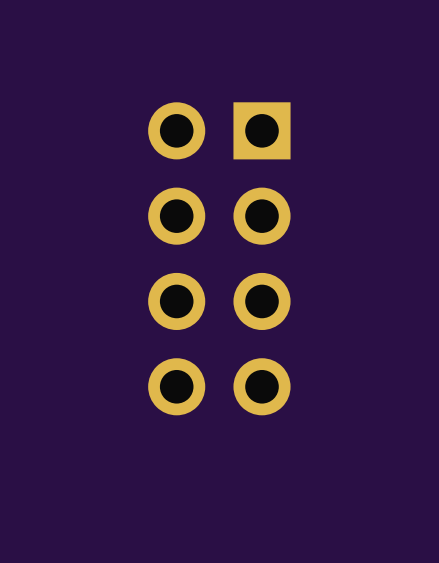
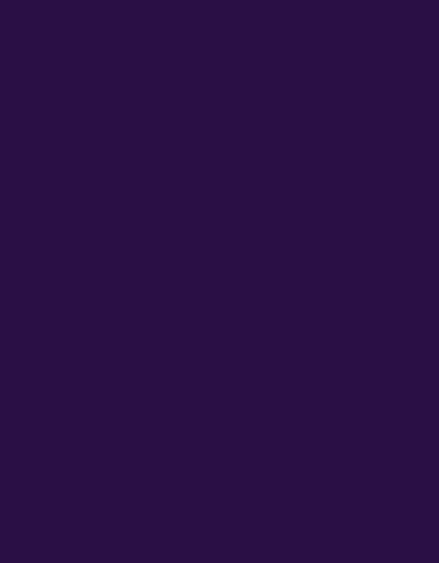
part: (219, 258) -> none

